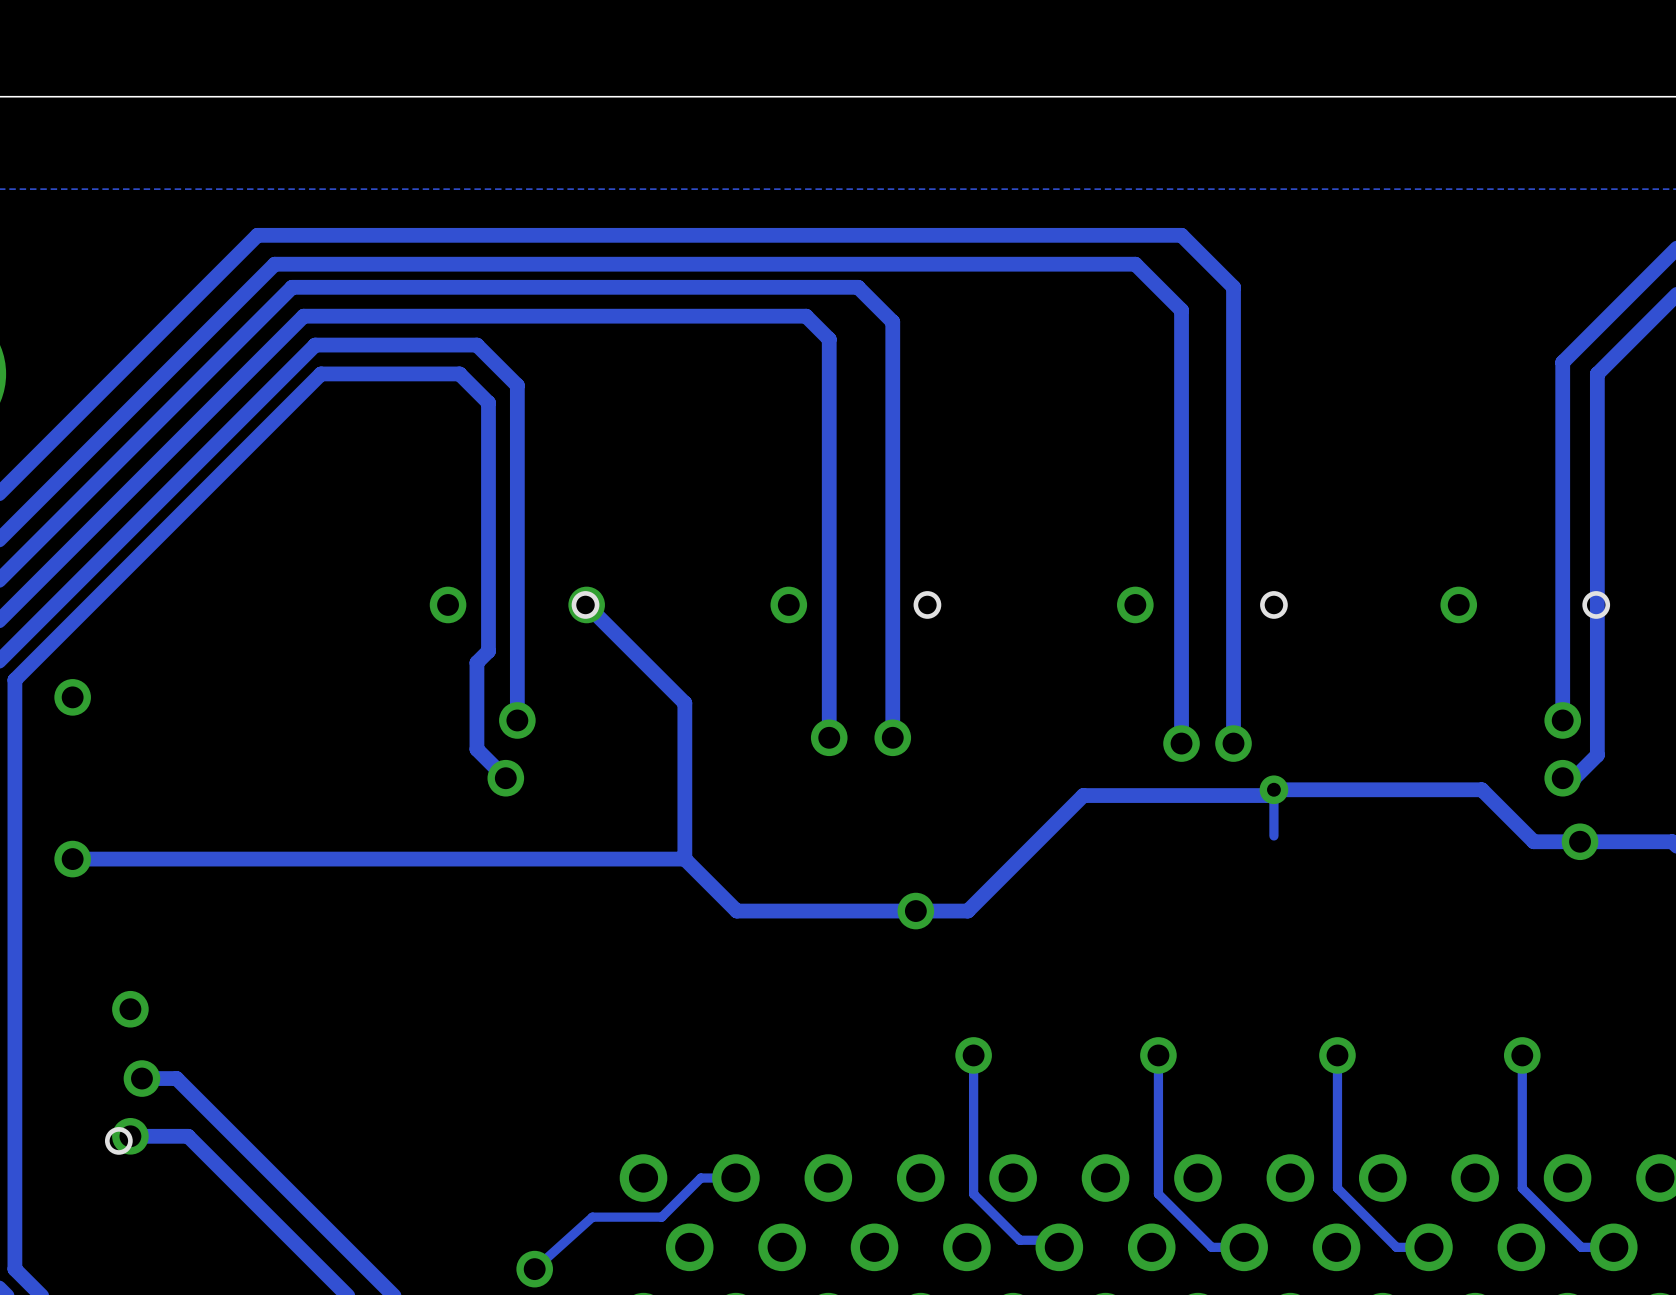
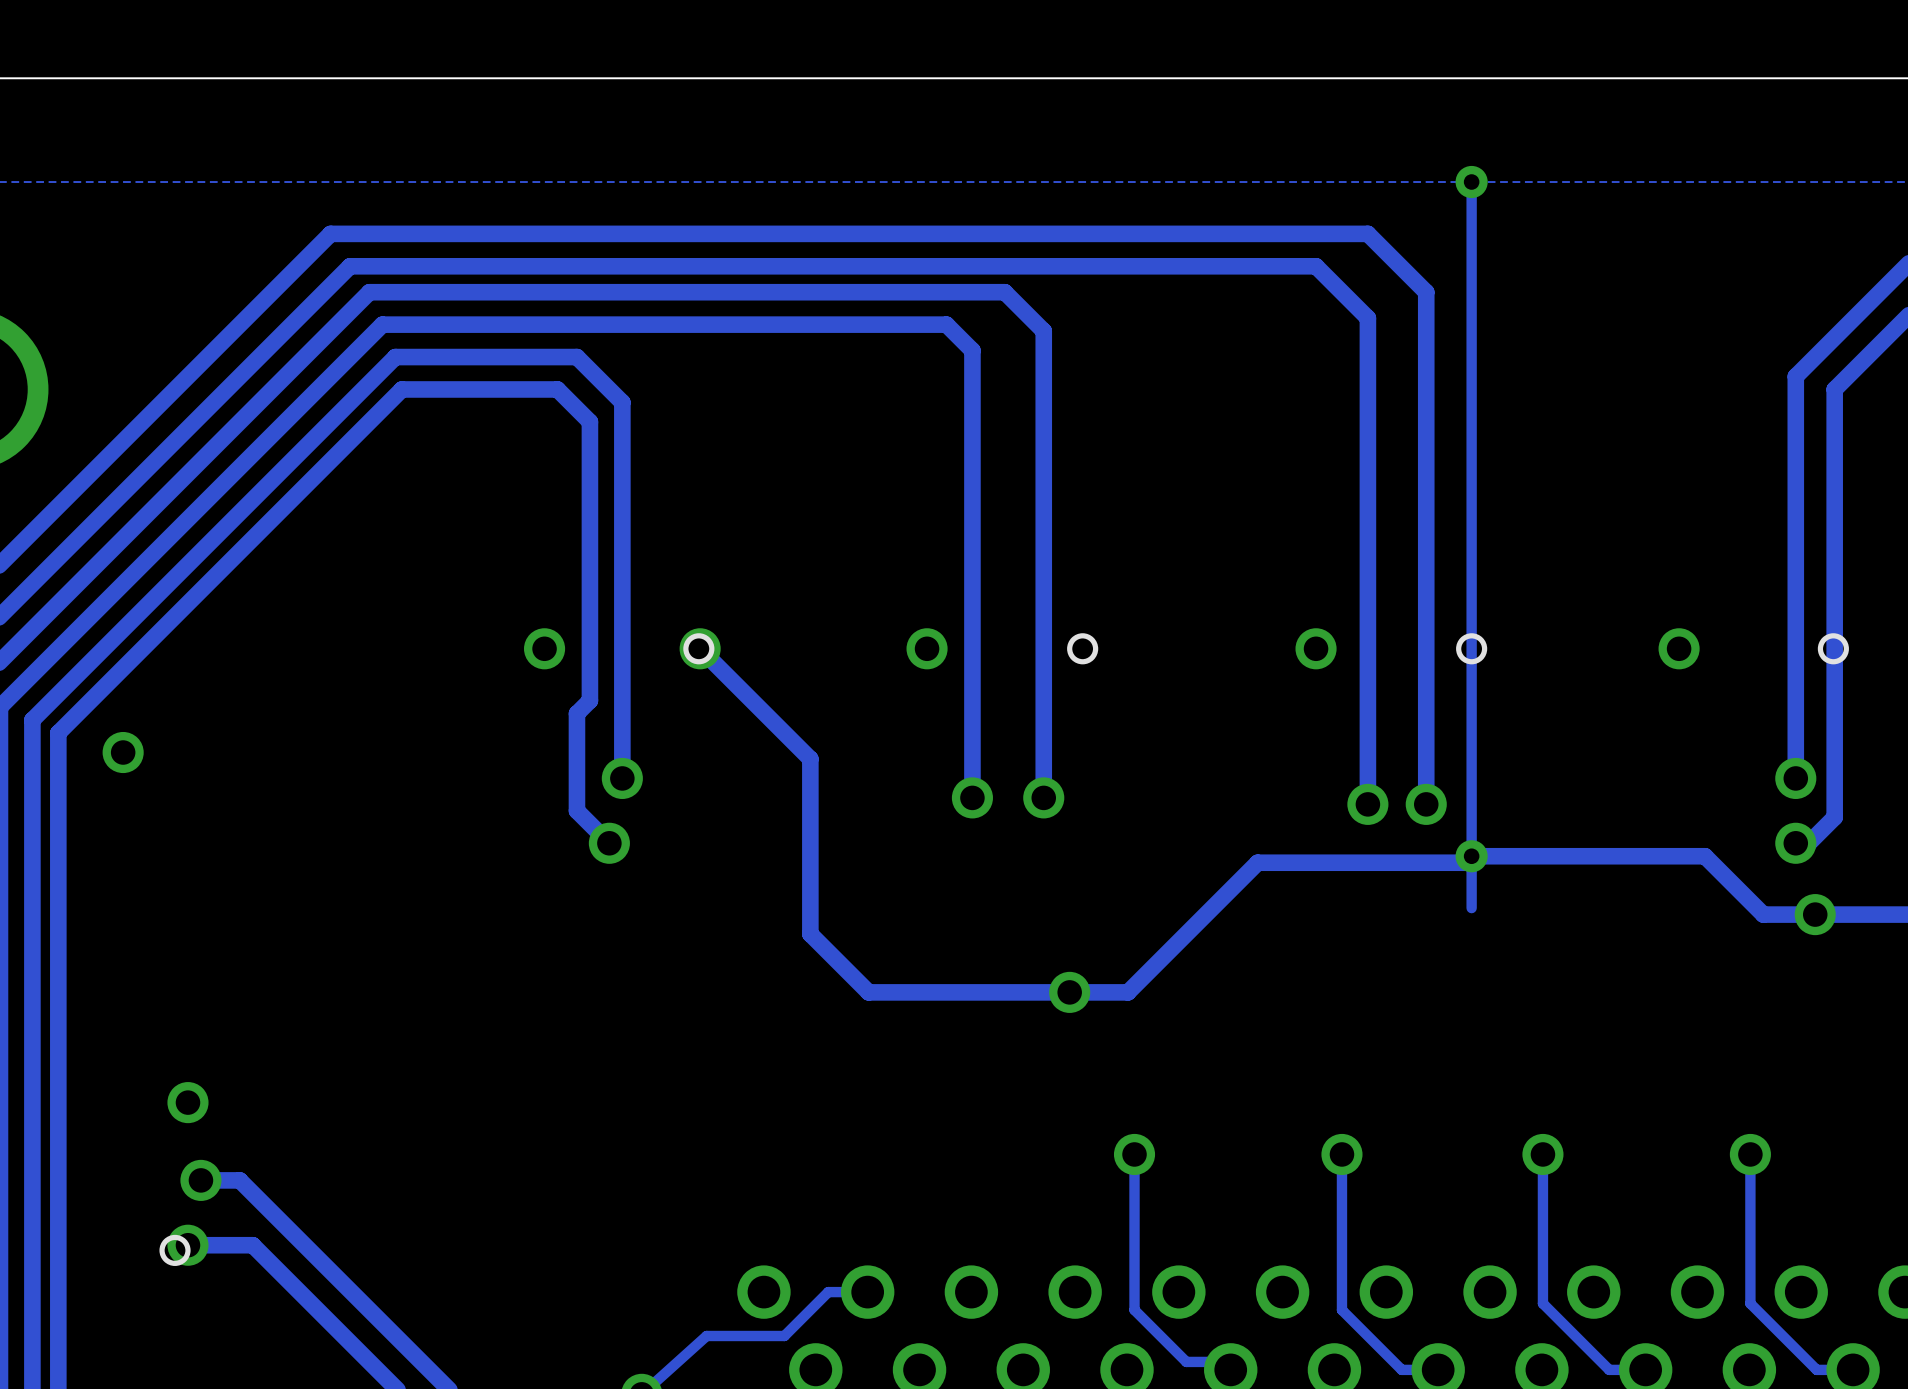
track: none -> (1471, 182) (1471, 856)
via: none -> (1471, 182)
via: (72, 859) -> none
track: (684, 859) (72, 859) -> none

